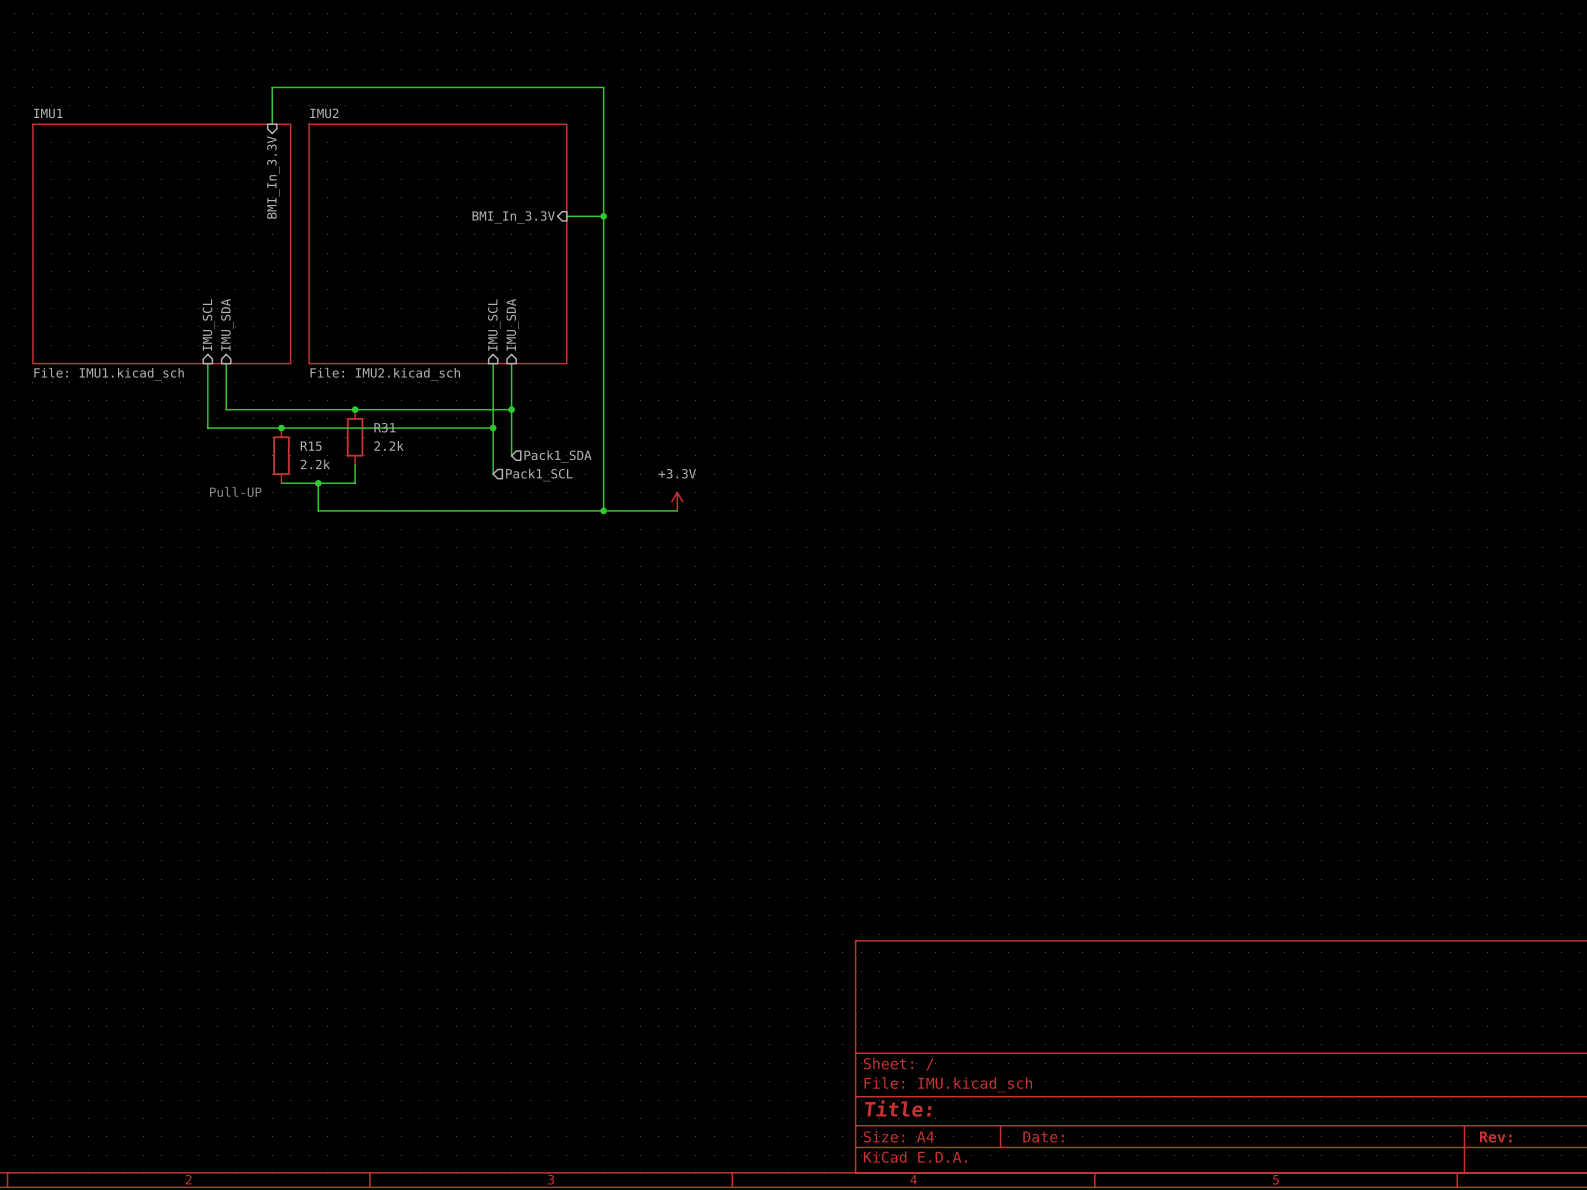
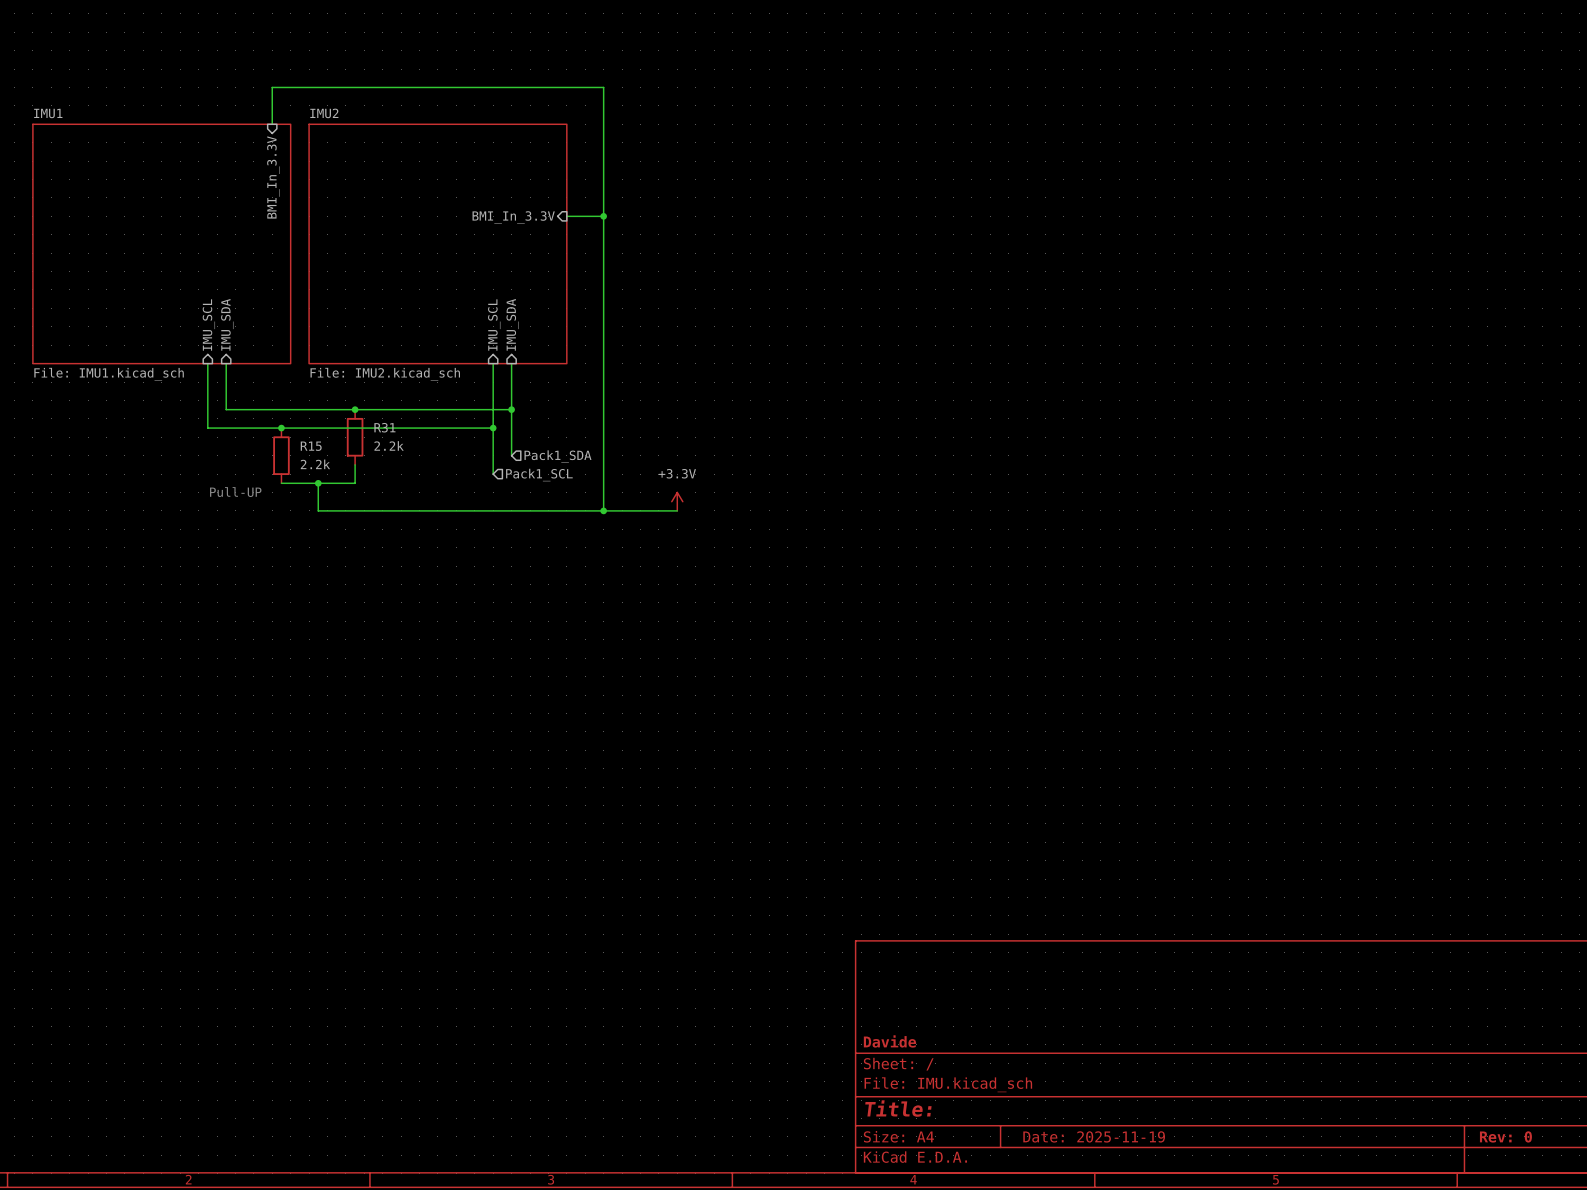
title block: none -> Davide (889, 1041)
title block: Date: (1043, 1137) -> Date: 2025-11-19 (1094, 1136)
title block: Rev: (1495, 1137) -> Rev: 0 (1505, 1136)

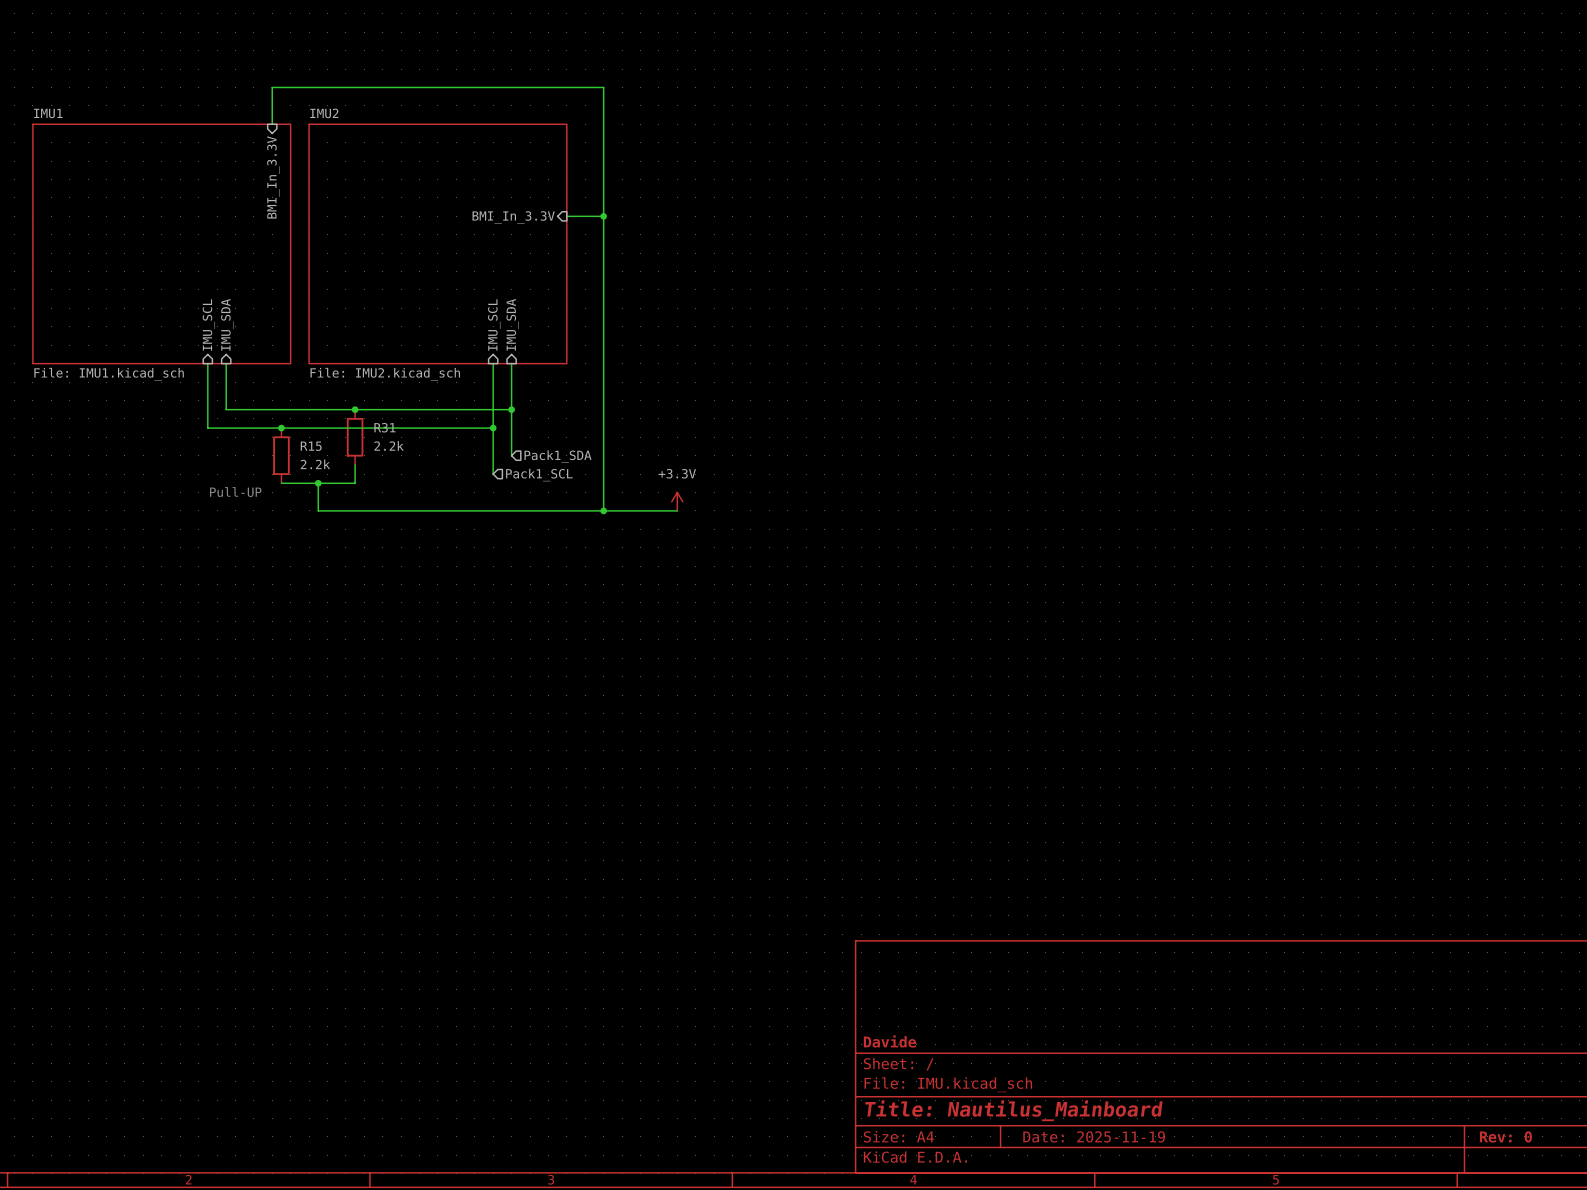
title block: Title: (898, 1108) -> Title: Nautilus_Mainboard (1013, 1110)

